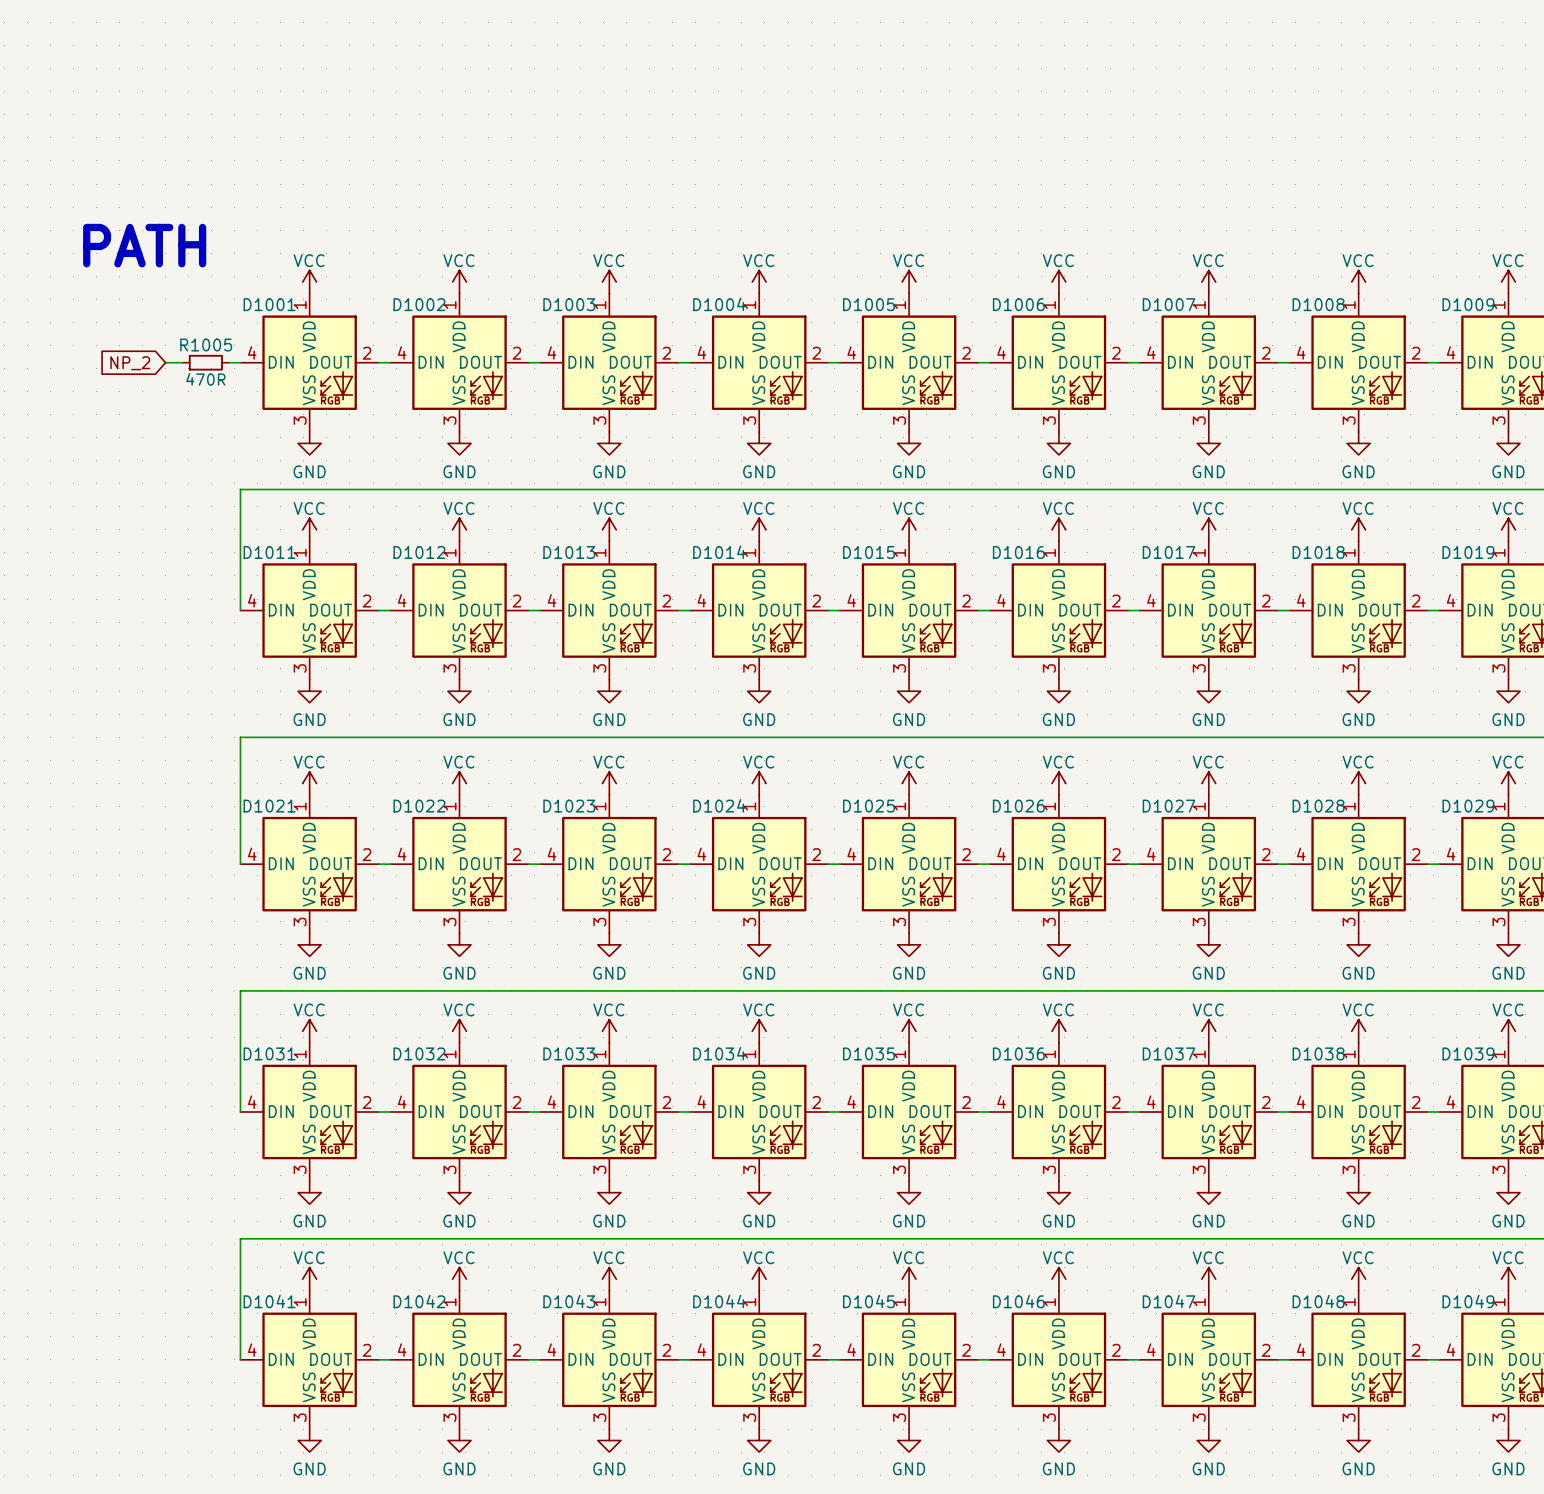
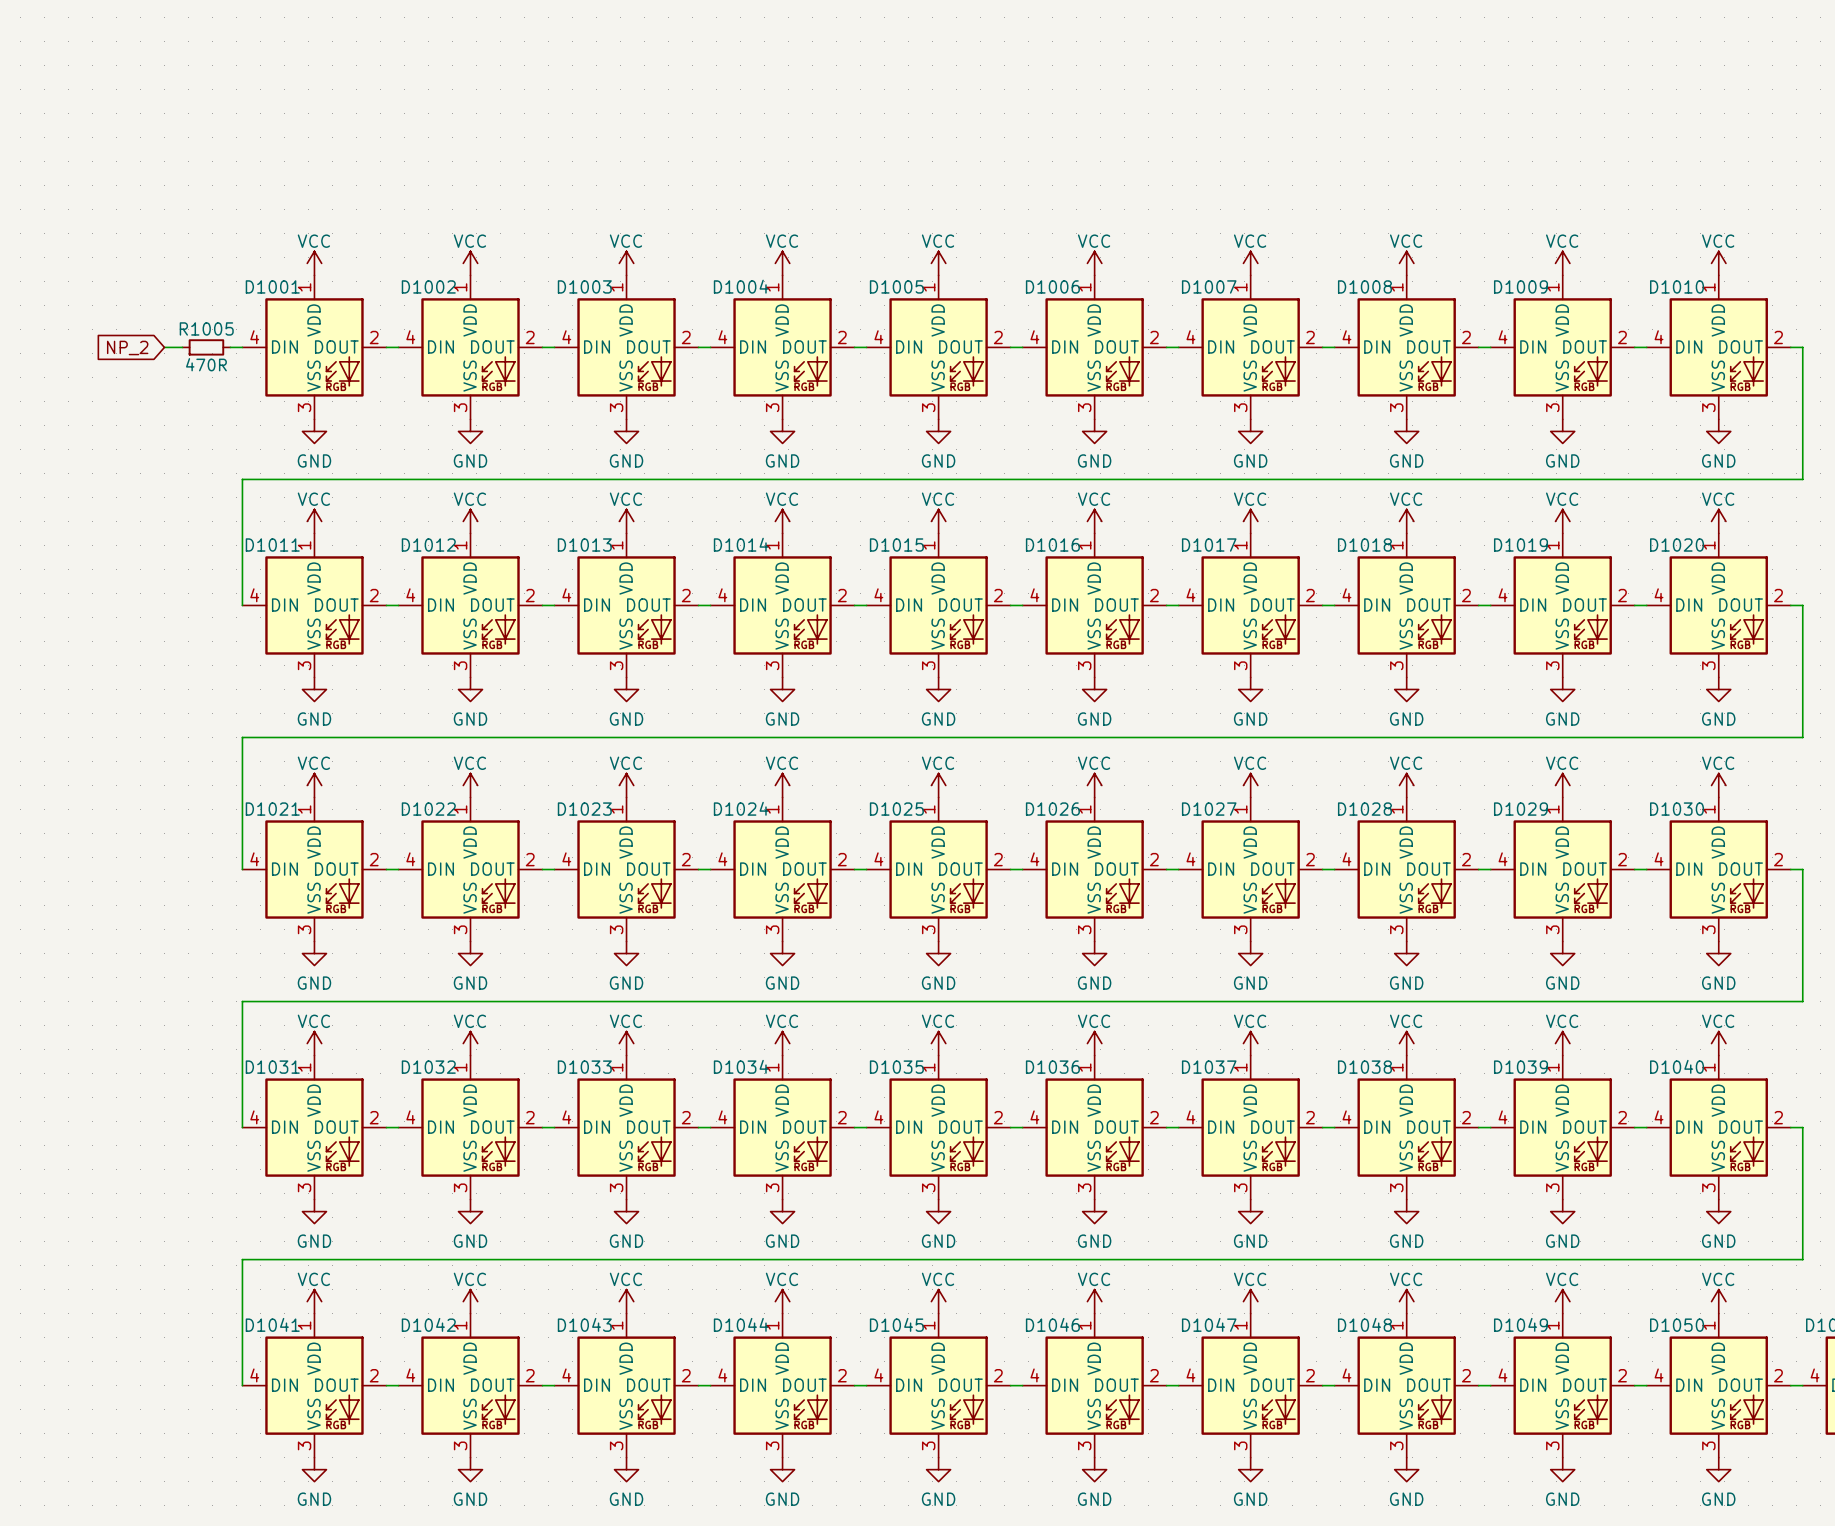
text: PATH (144, 245) -> none

